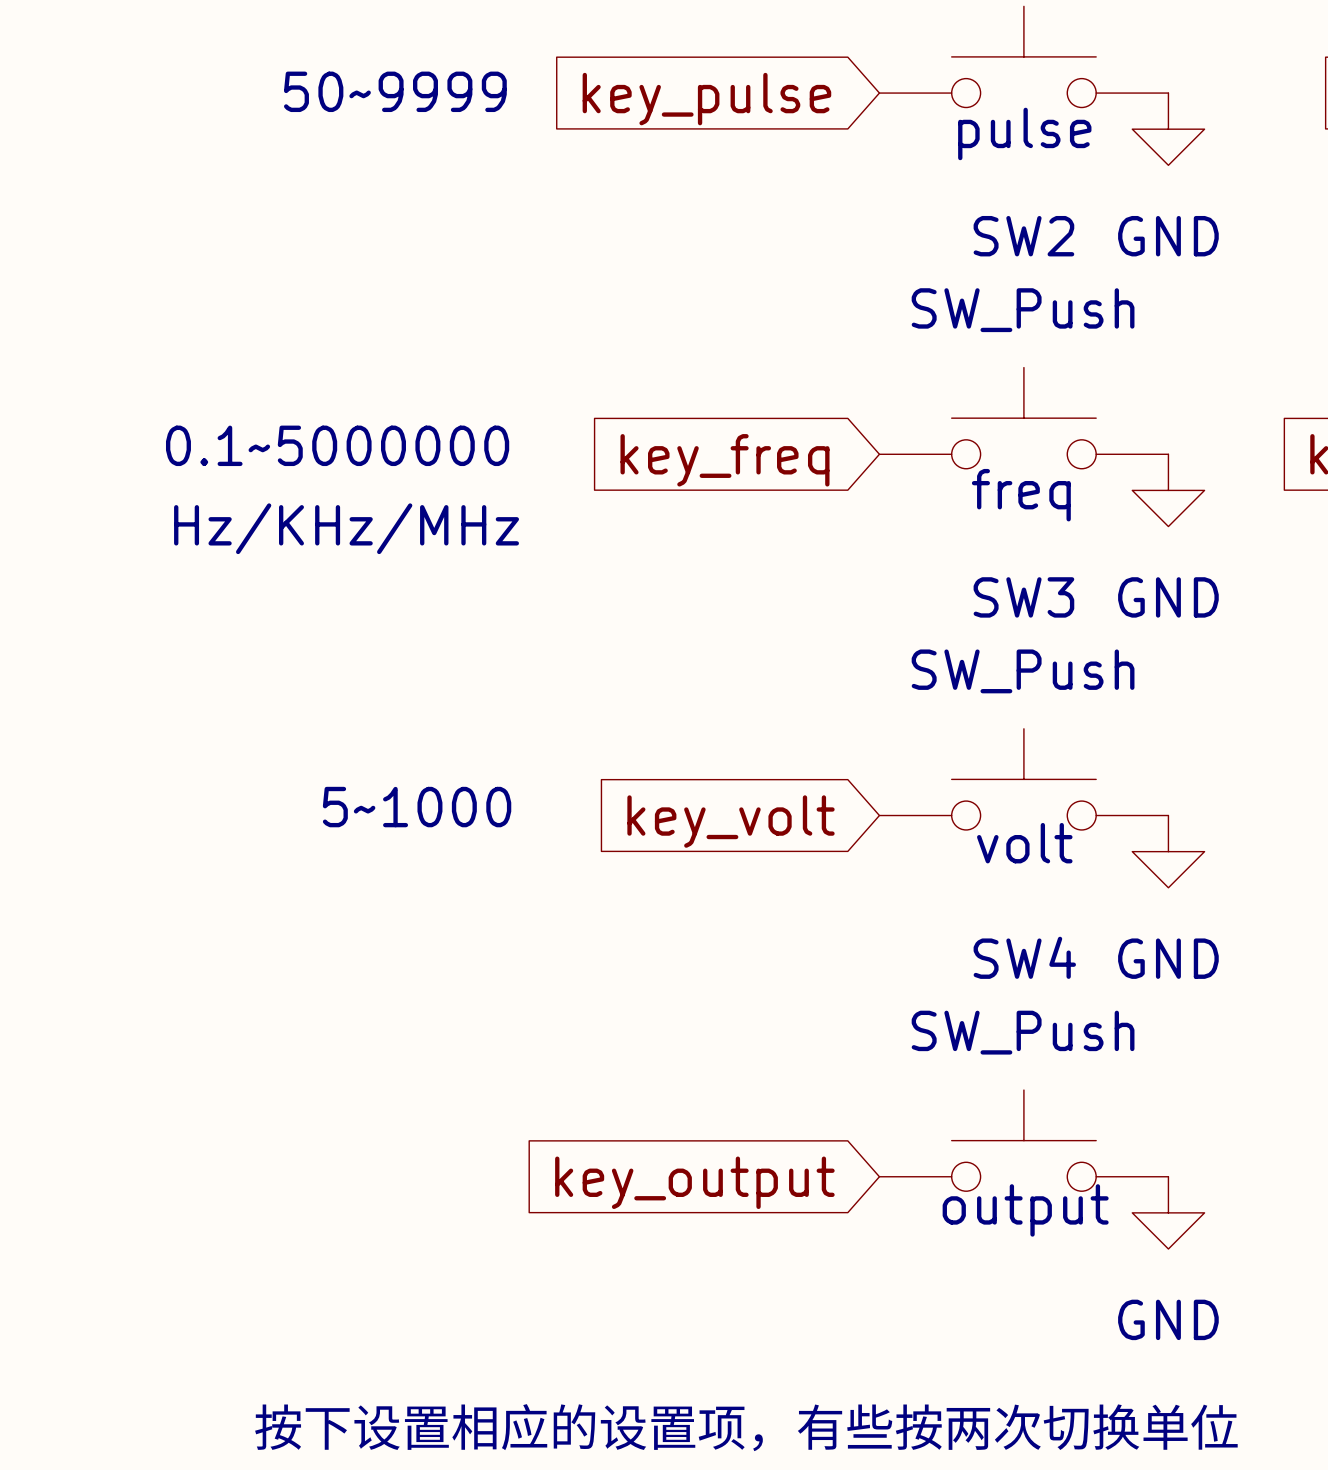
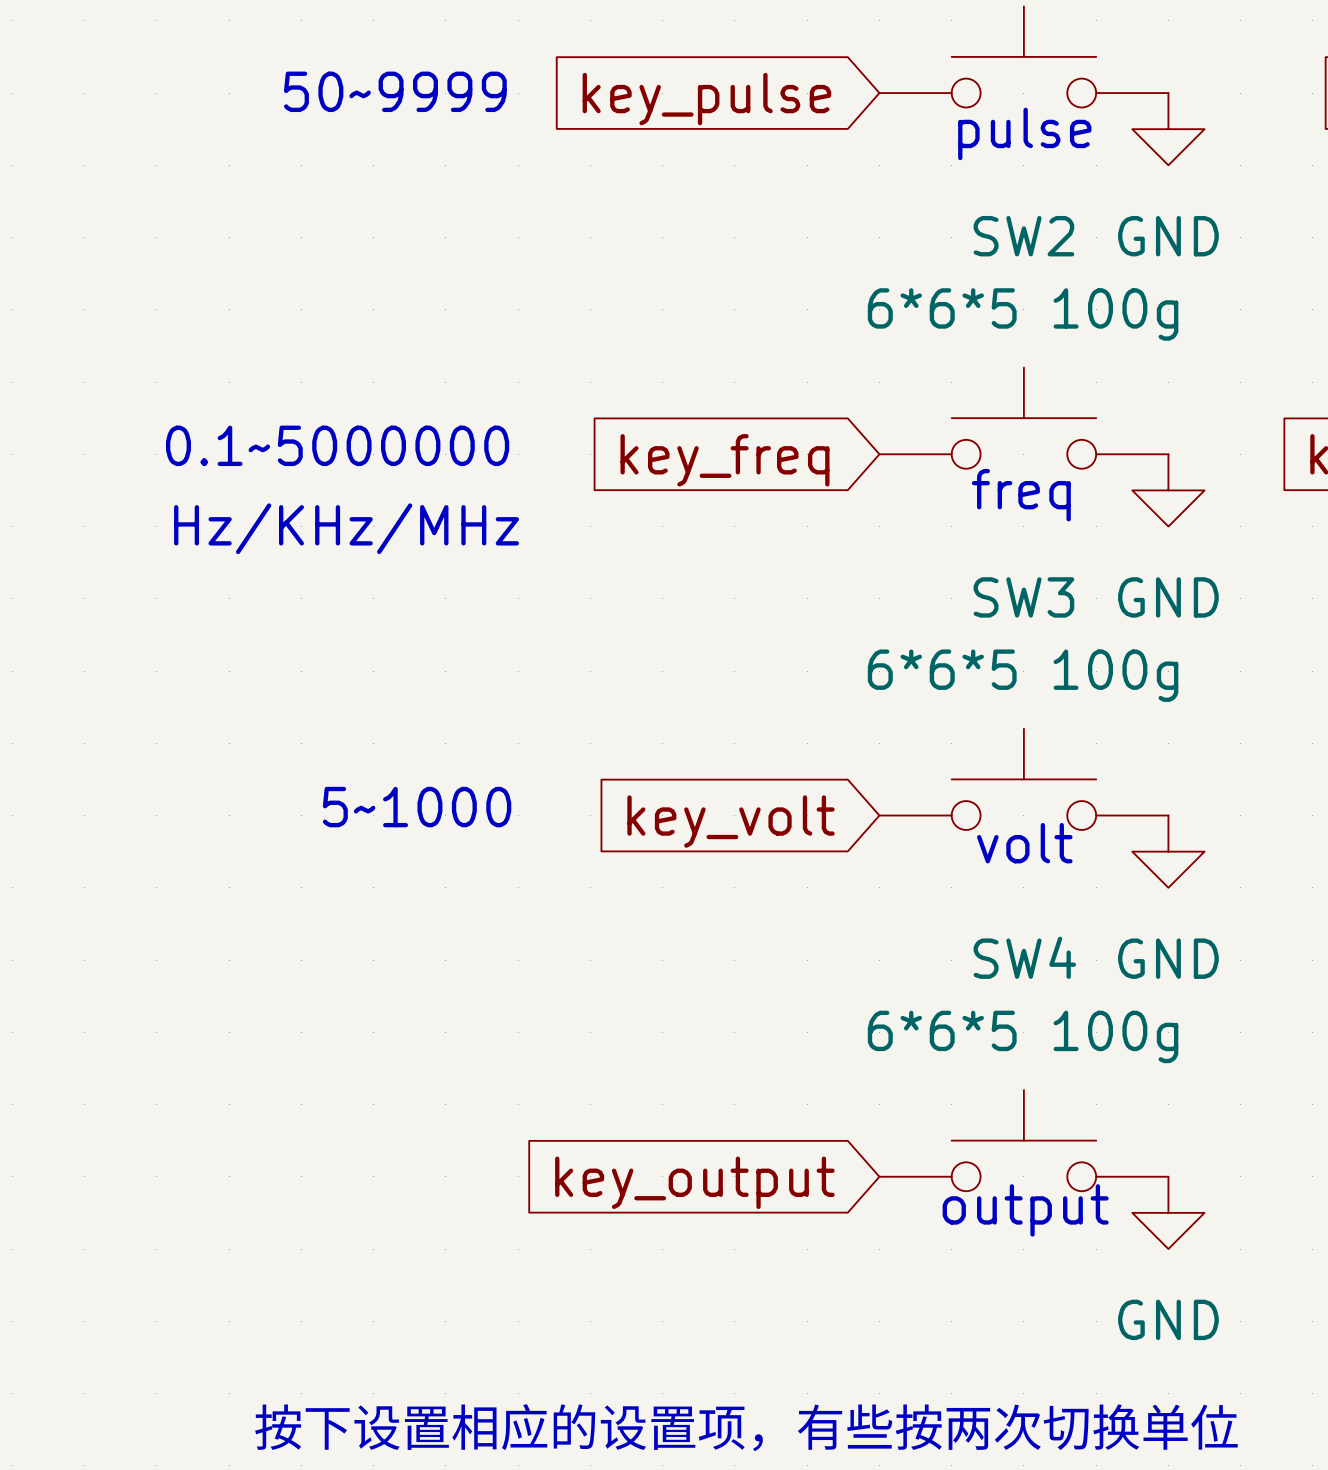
SW2 value: SW_Push (1023, 310) -> 6*6*5 100g (1023, 314)
SW3 value: SW_Push (1023, 671) -> 6*6*5 100g (1023, 675)
SW4 value: SW_Push (1023, 1032) -> 6*6*5 100g (1023, 1036)

